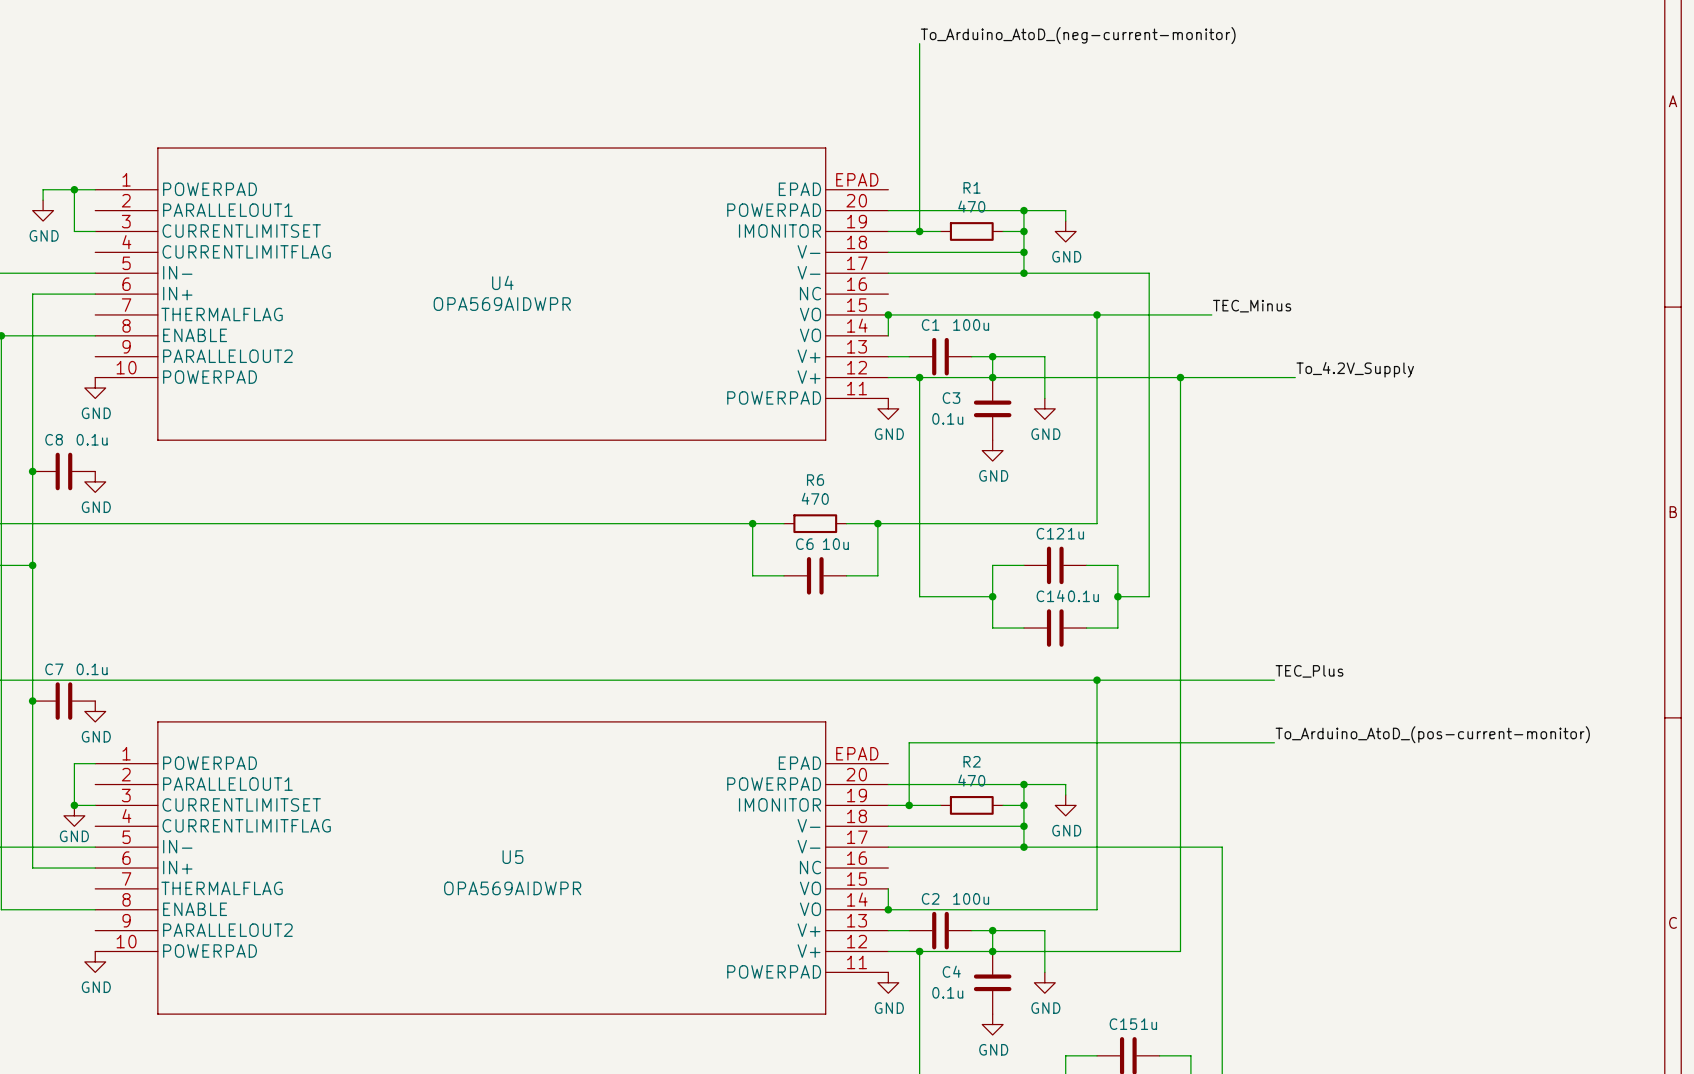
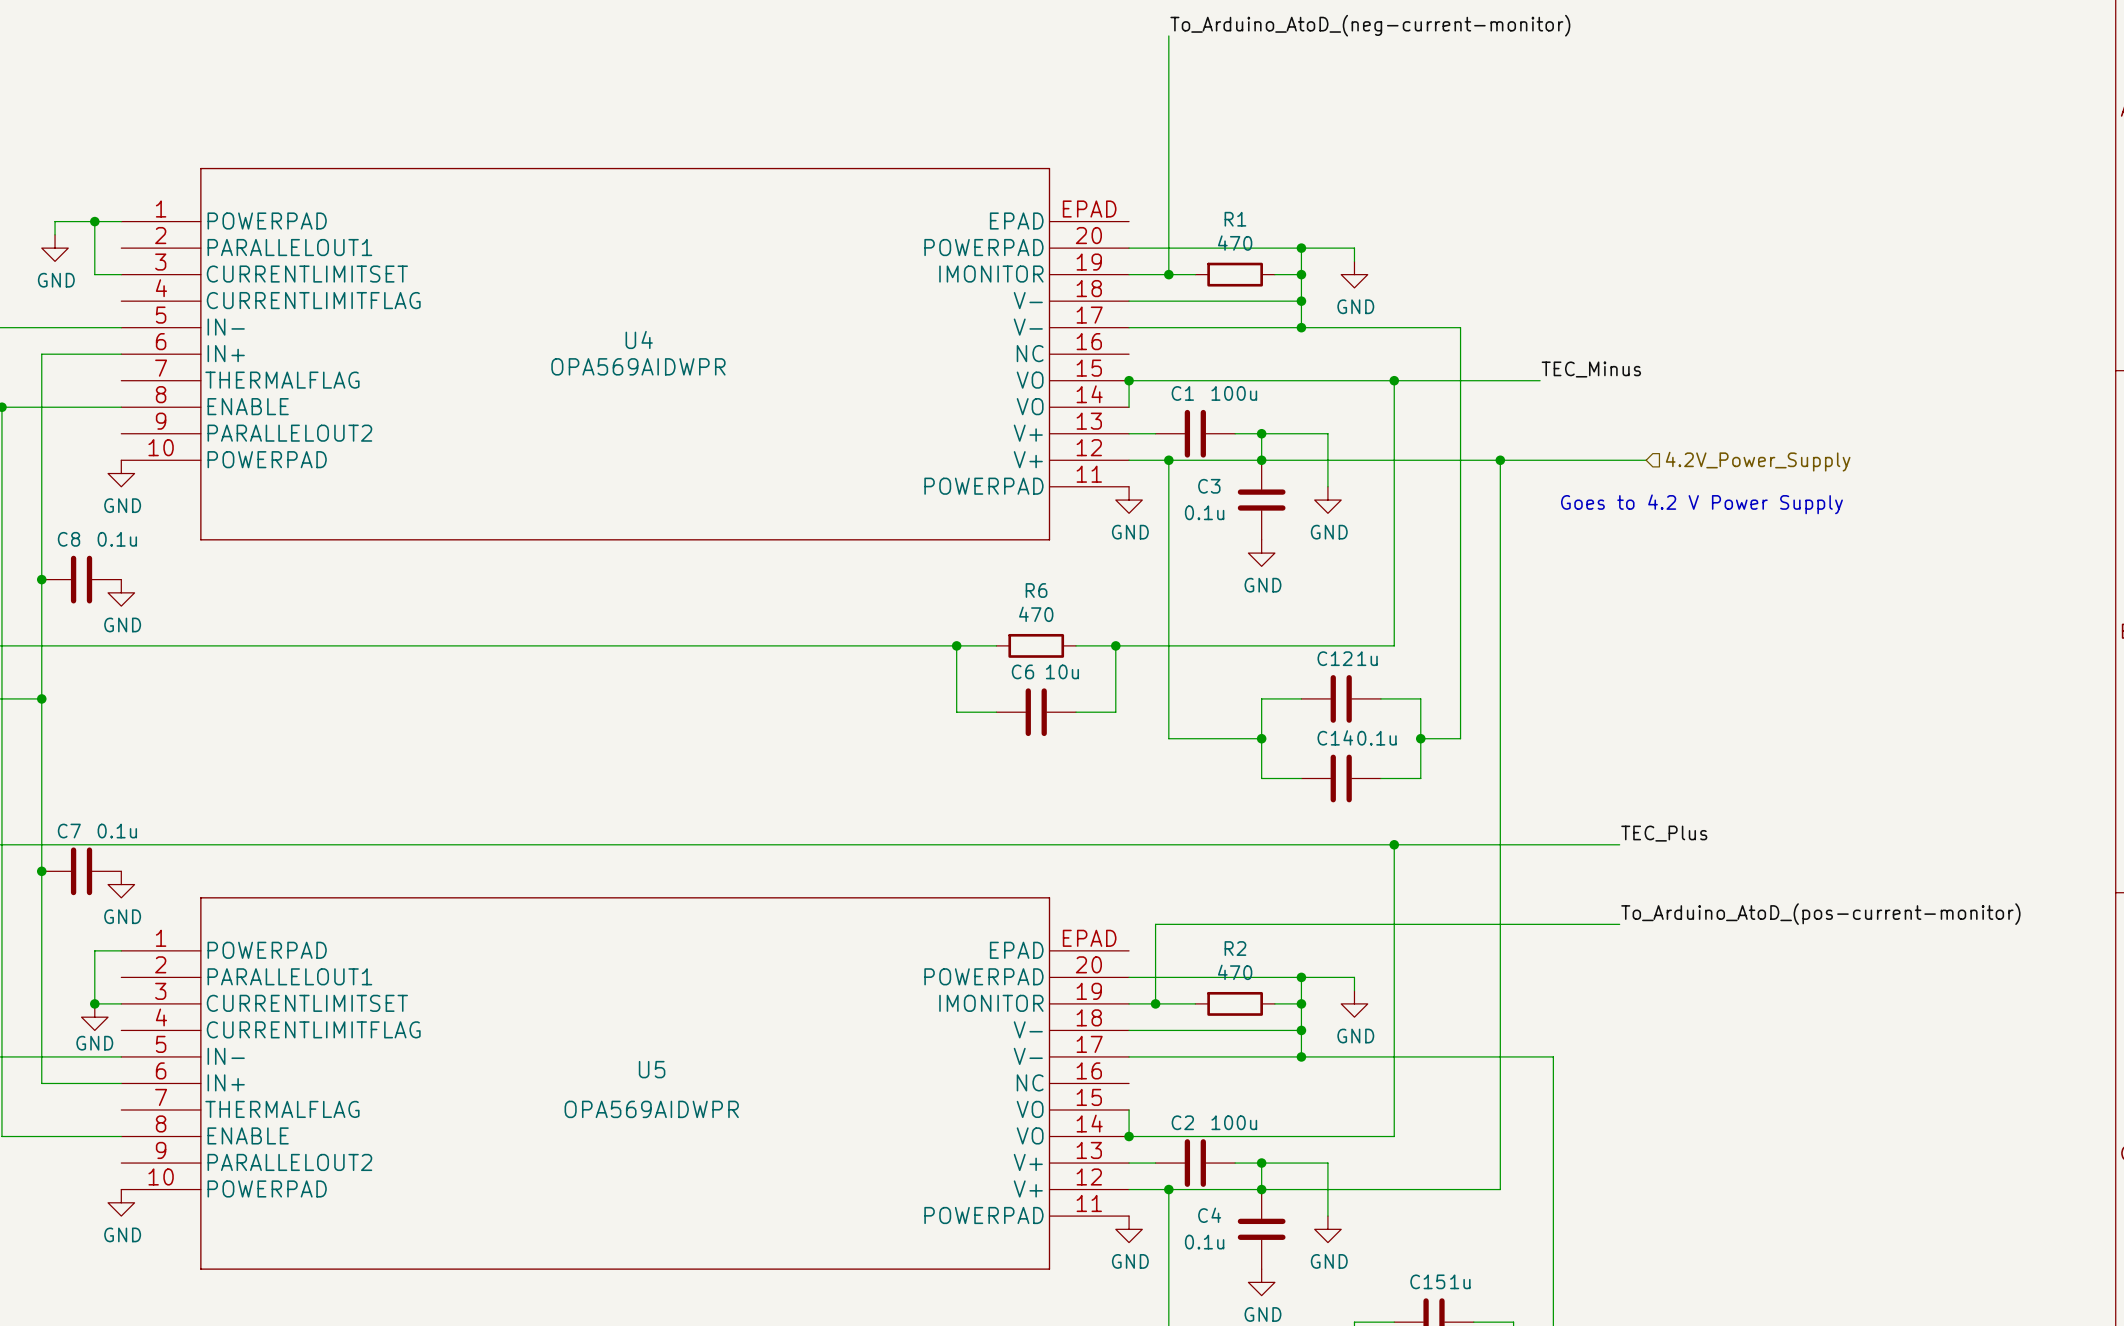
label: To_4.2V_Supply (1355, 369) -> none
hierarchical label: none -> 4.2V_Power_Supply (1758, 461)
text: none -> Goes to 4.2 V Power Supply (1701, 504)

